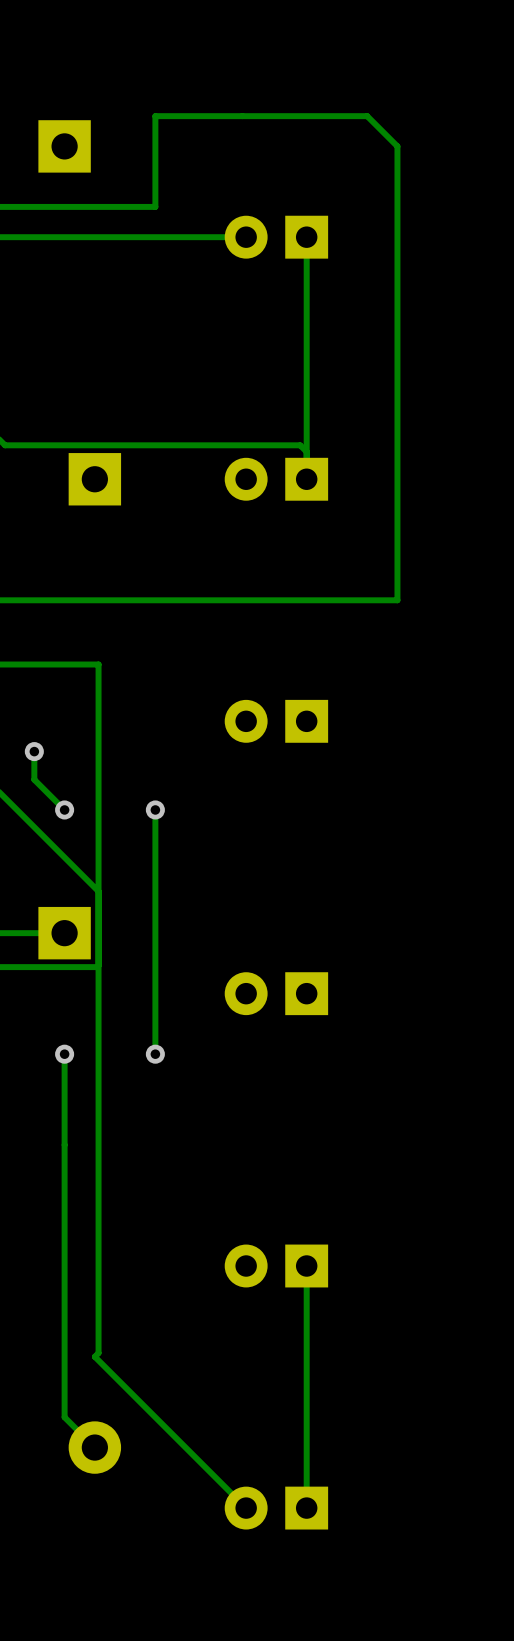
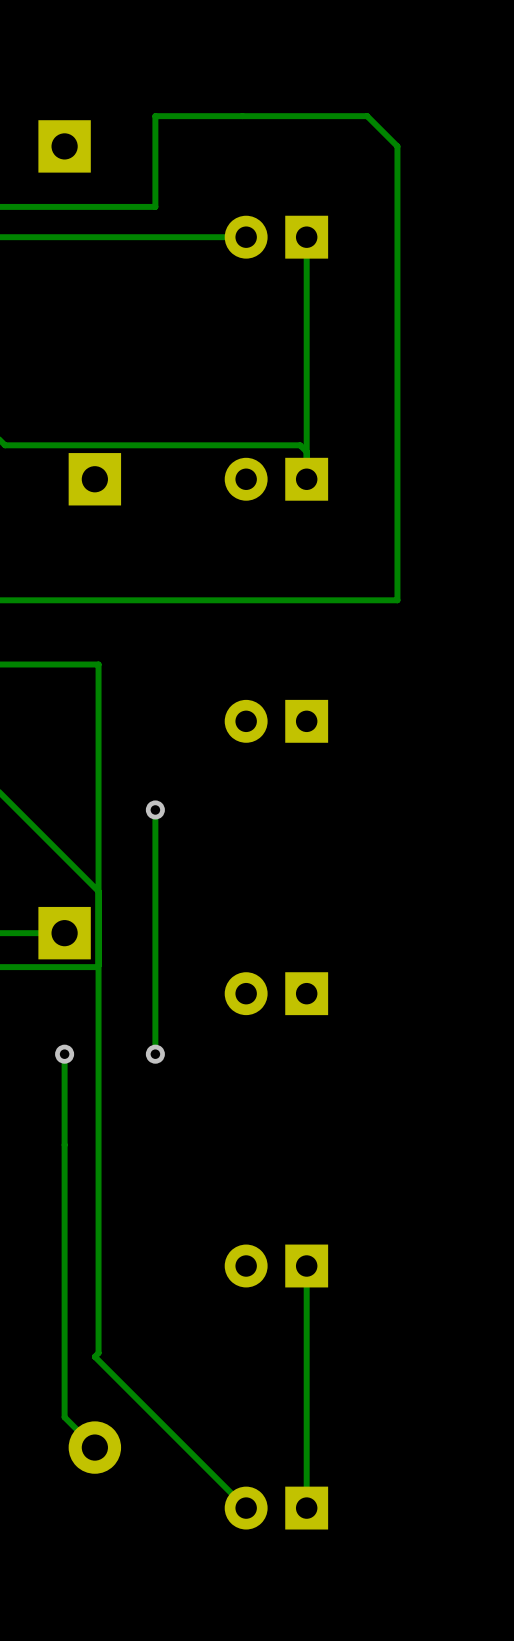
track: (34, 751) (34, 779) (64, 809) -> none
via: (34, 751) -> none
via: (64, 809) -> none

